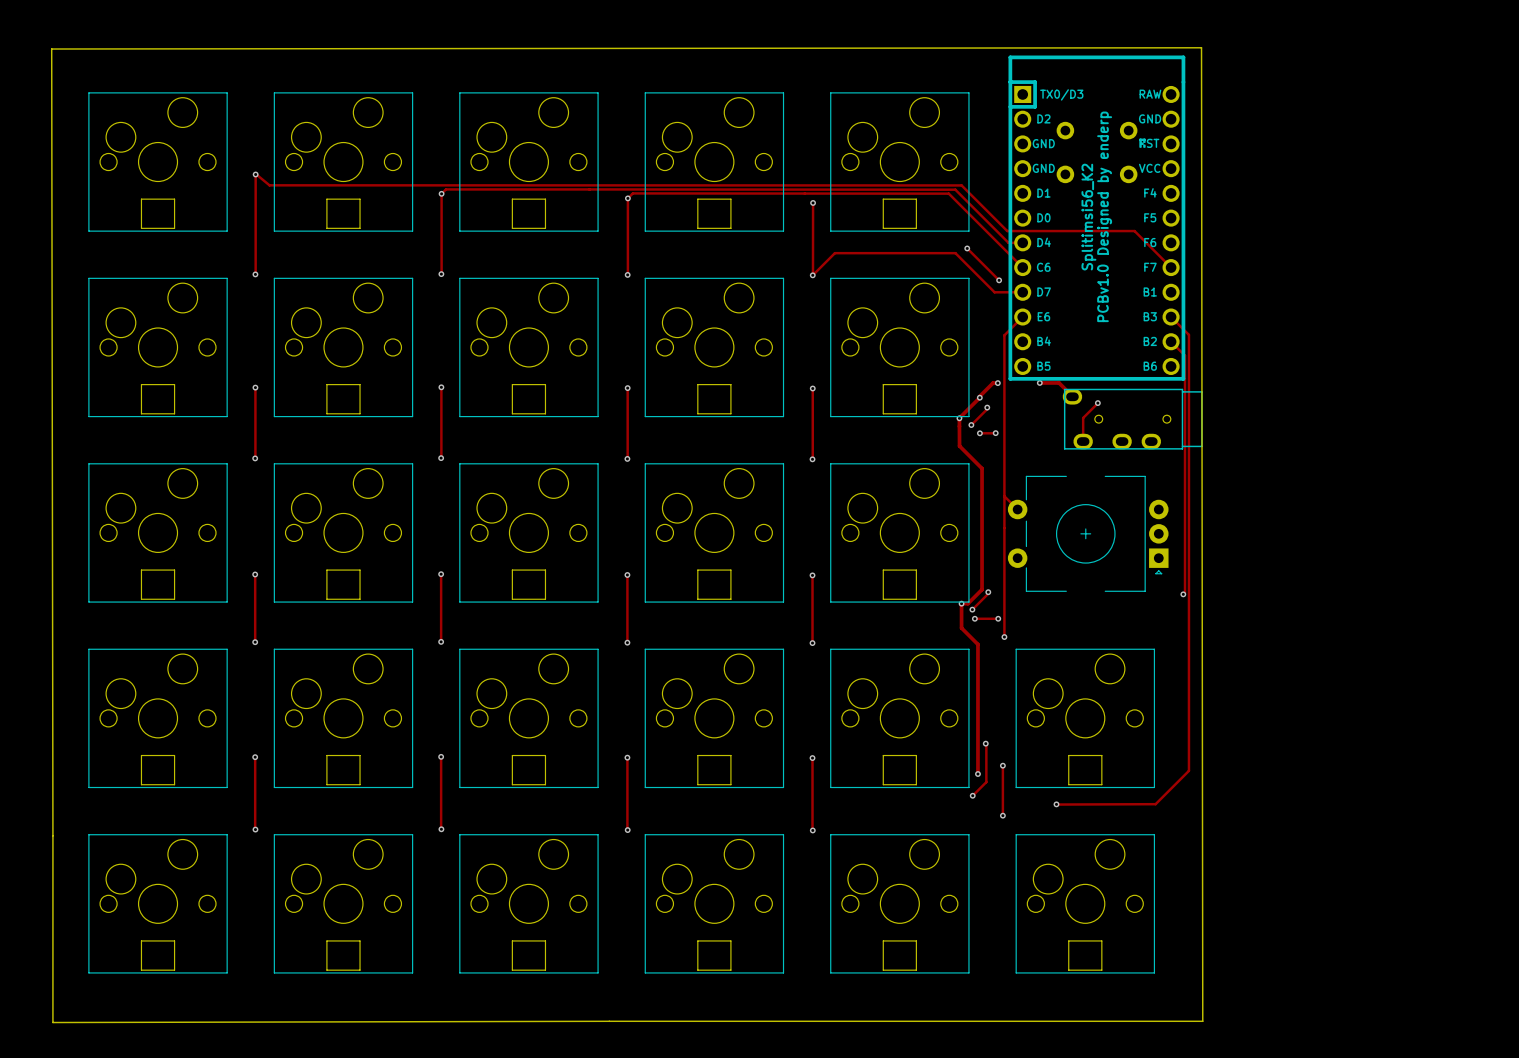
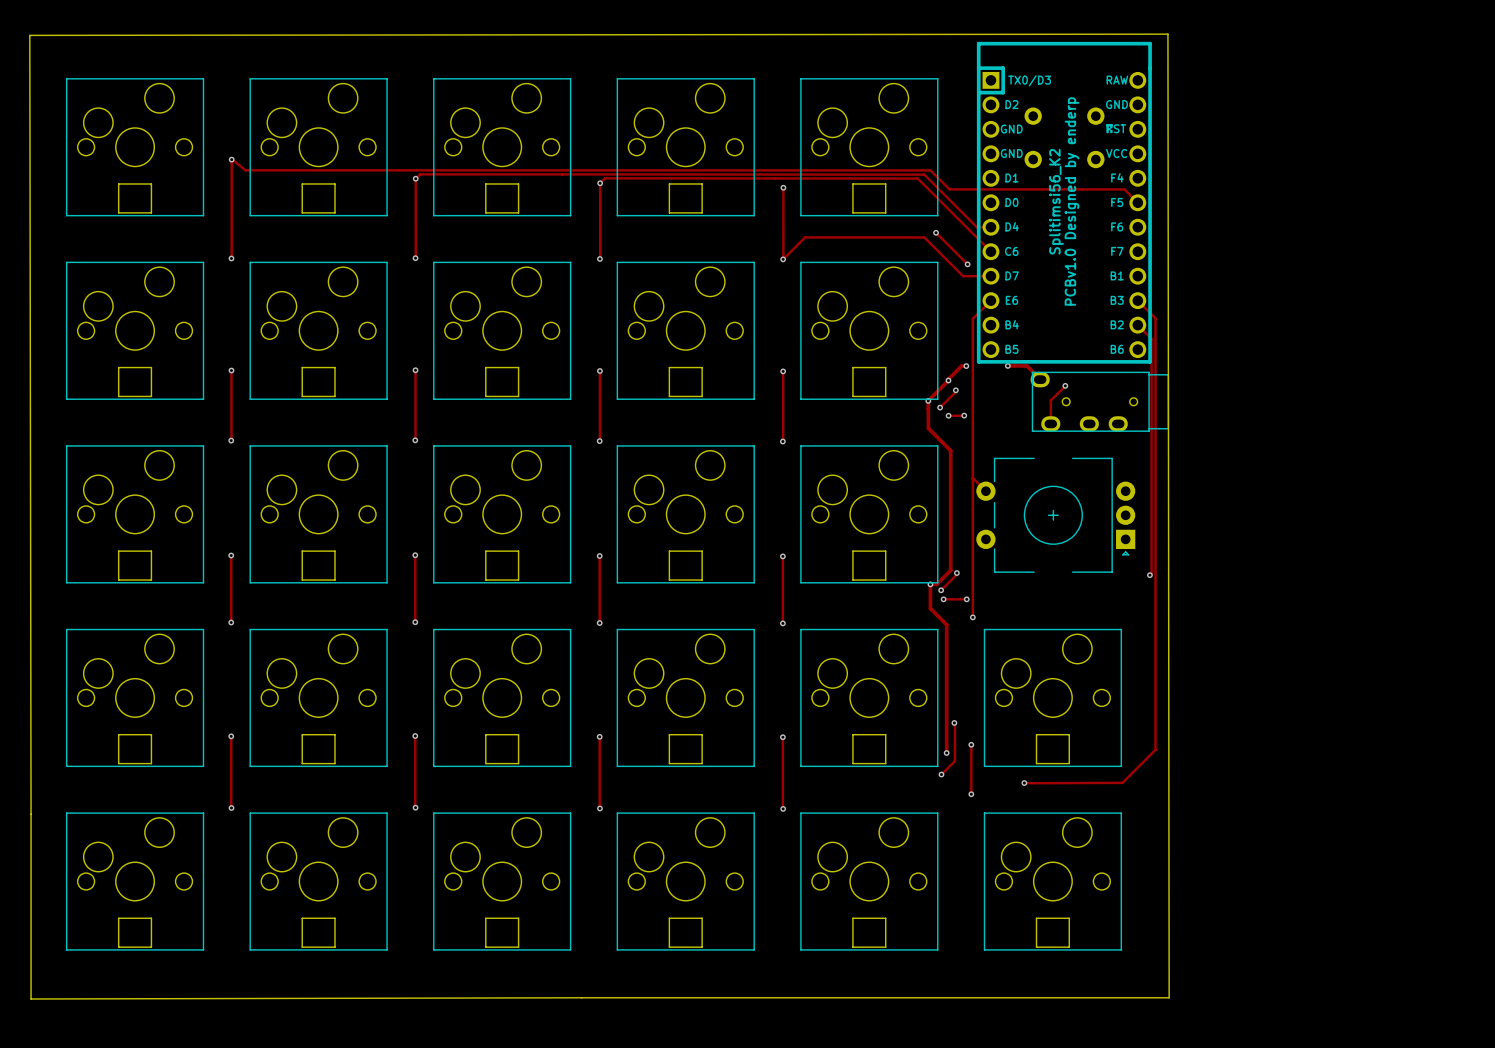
track: (980, 204) (1007, 231) (1134, 231) (1171, 267) -> (949, 189) (1124, 189) (1137, 202)

